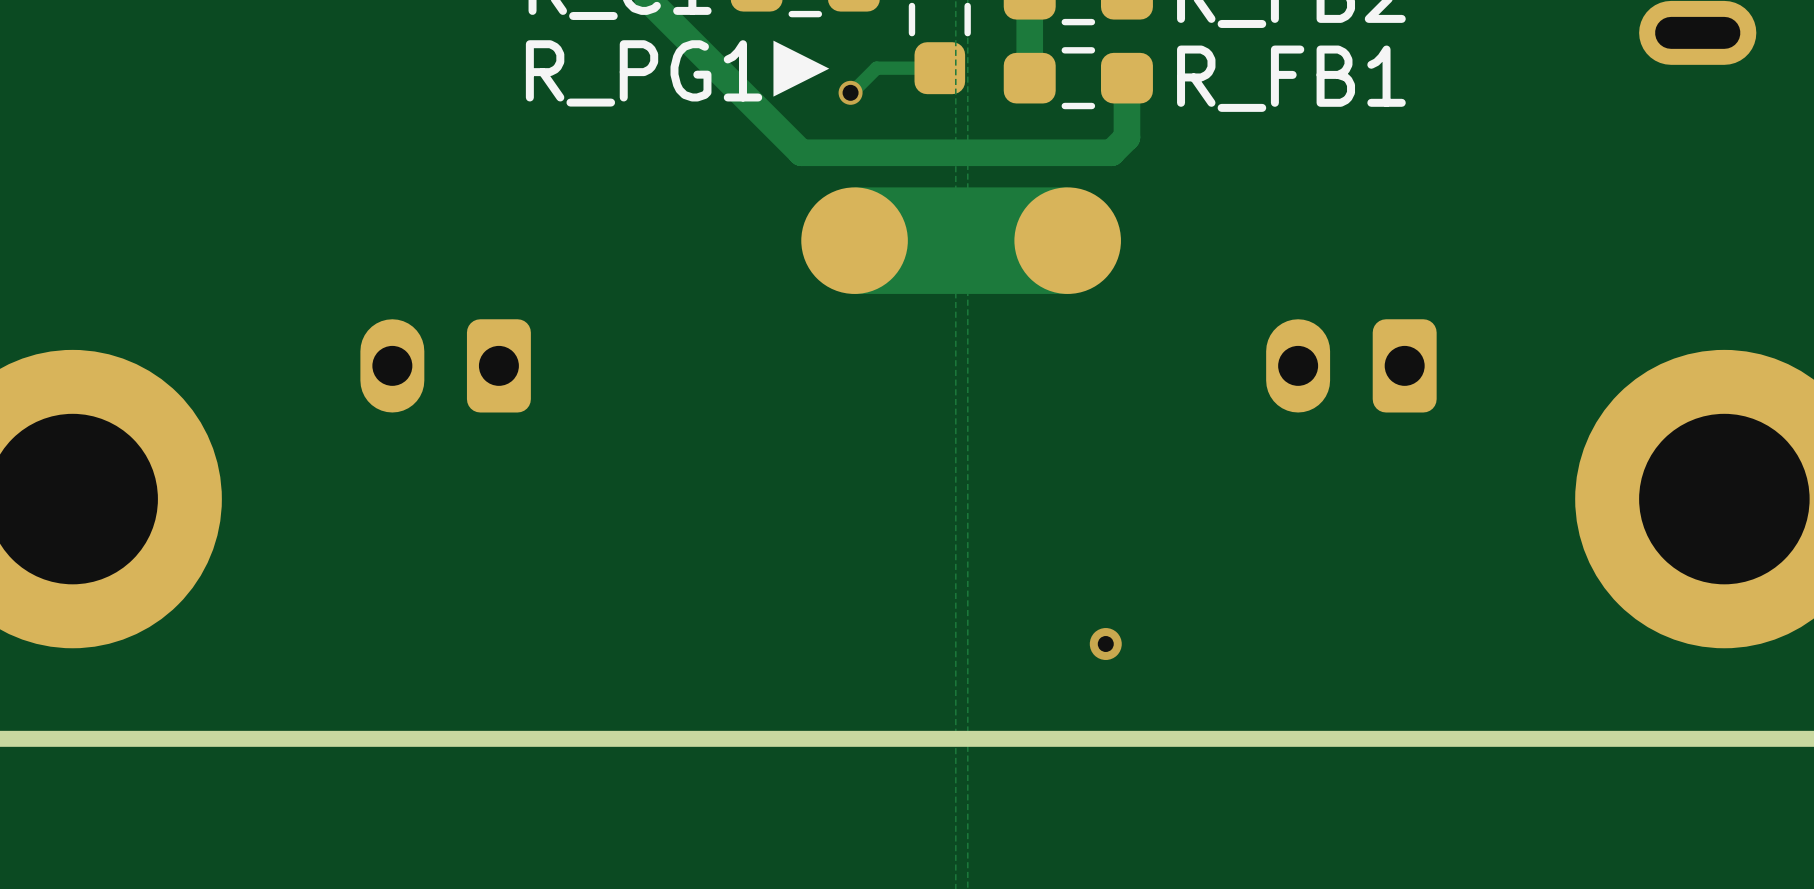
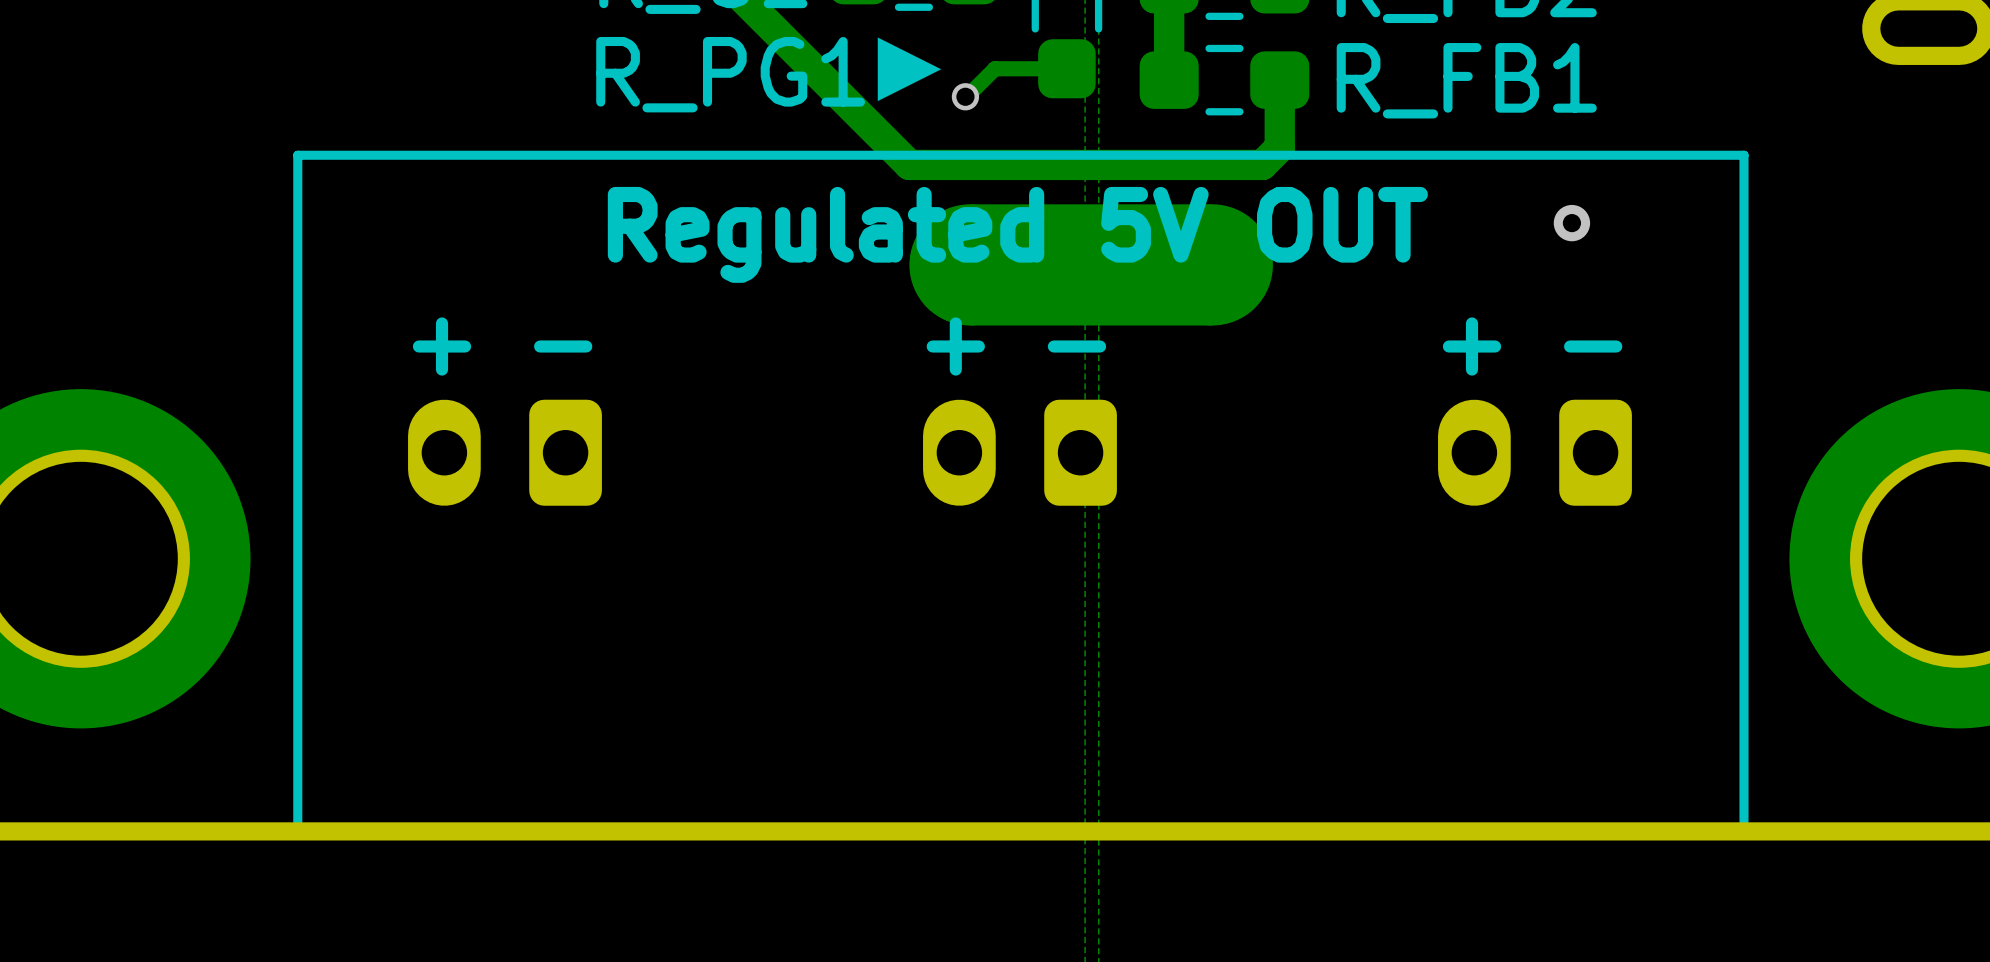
via: none -> (1571, 223)
text: none -> Regulated 5V OUT (1017, 234)
text: none -> + - (502, 346)
text: none -> + - (1016, 346)
text: none -> + - (1532, 346)
part position: (445, 365) -> (504, 452)
part position: (1351, 365) -> (1534, 452)
part: none -> (1019, 452)
via: (1105, 644) -> none
line: none -> (1744, 829) (1744, 155) (297, 155) (297, 829)

